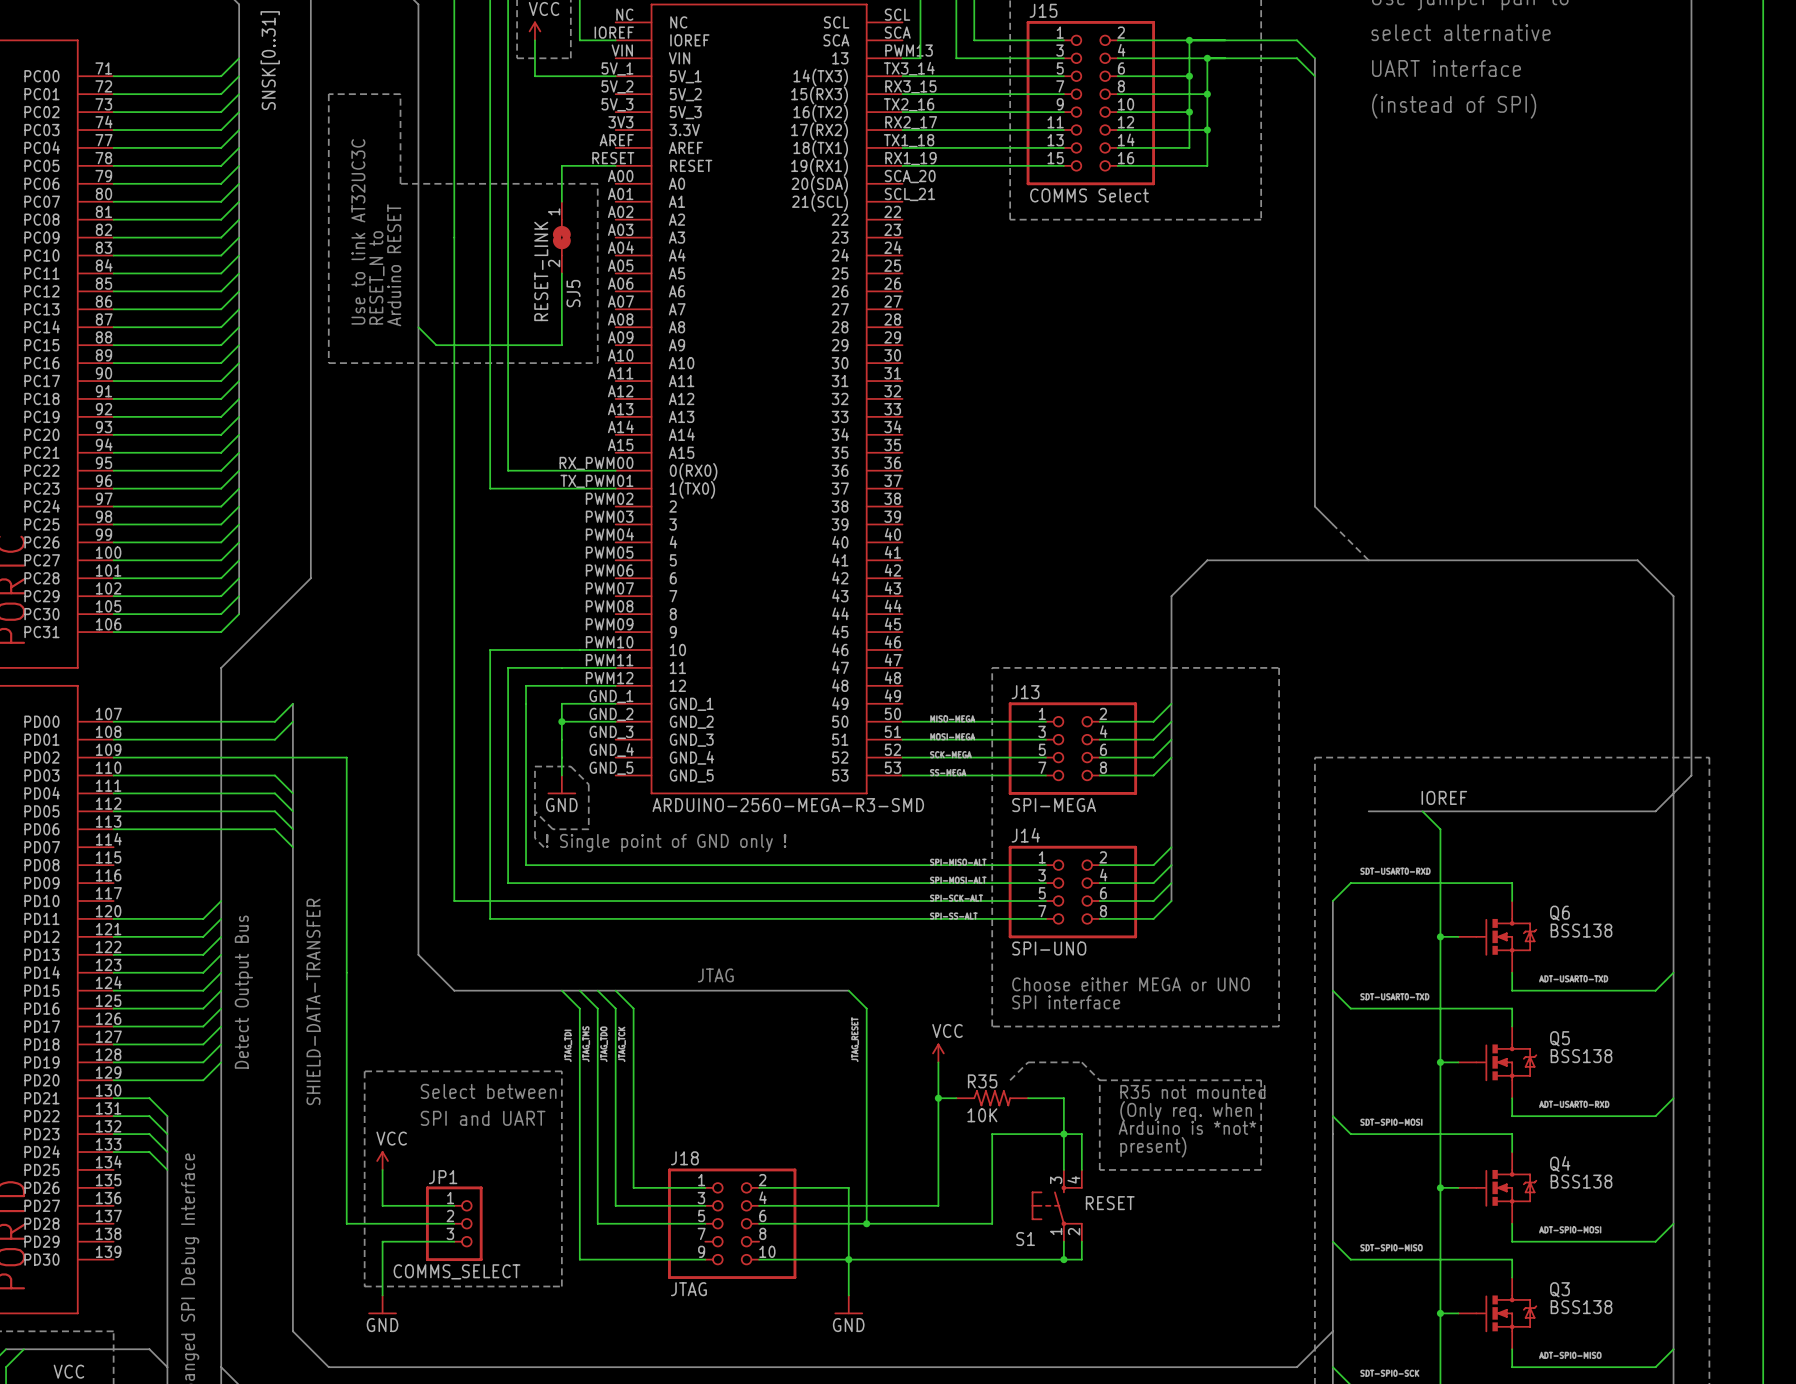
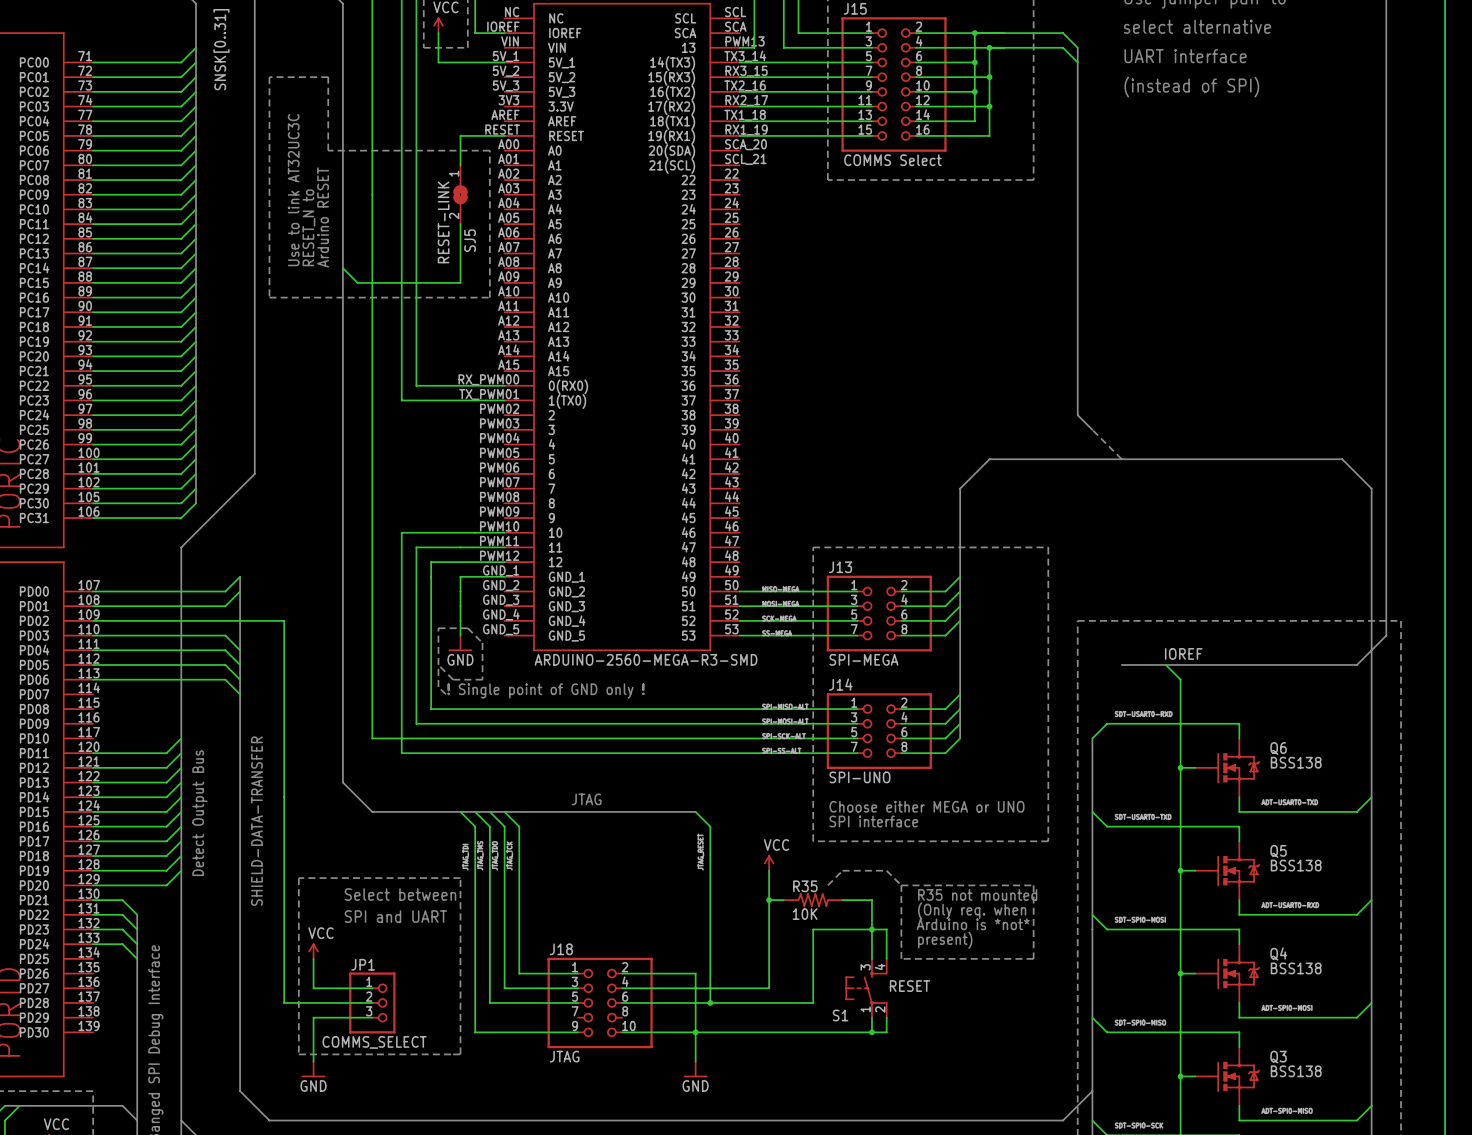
wire: (561, 721) (615, 721) -> none
junction: (561, 721) -> none

